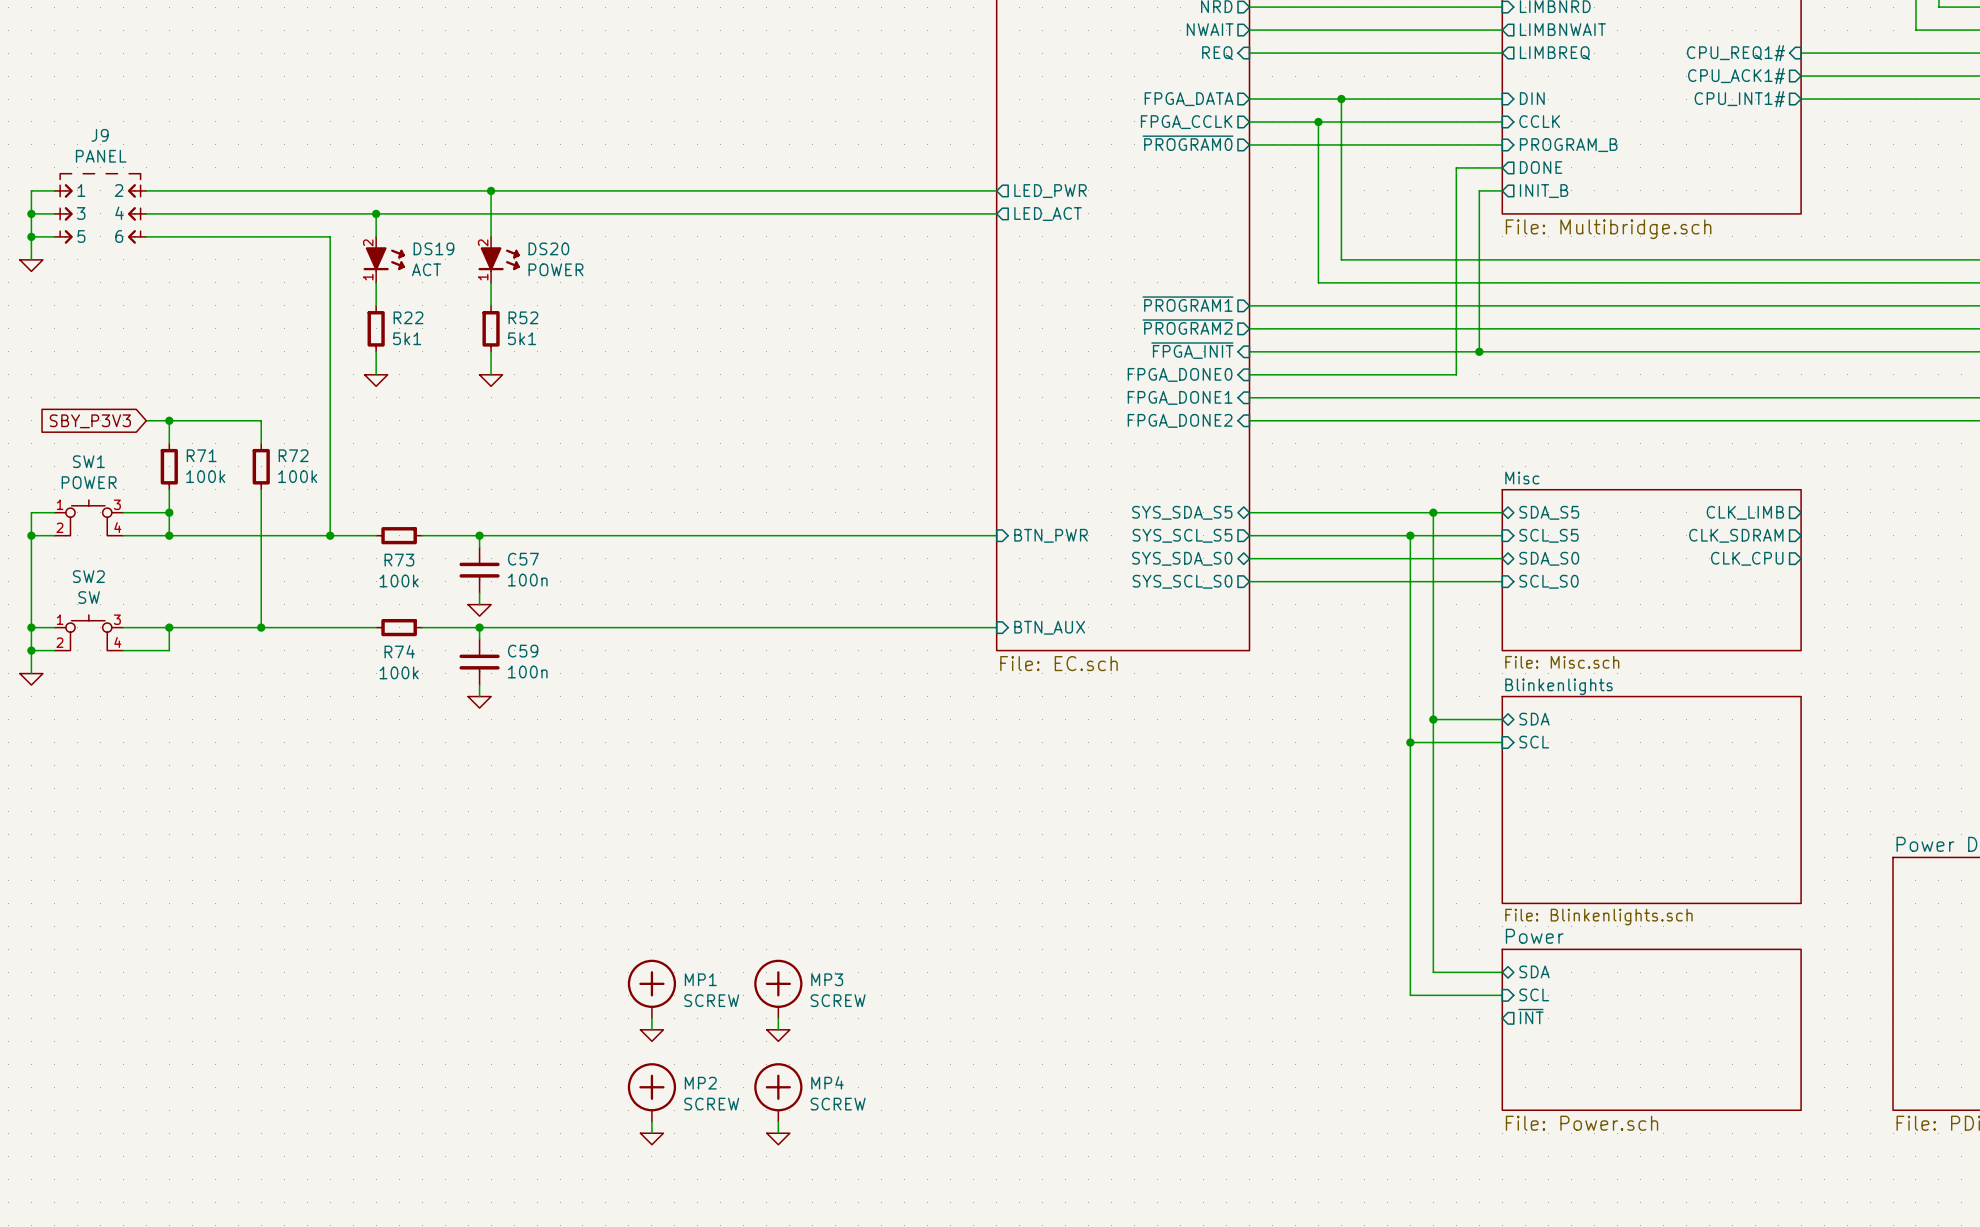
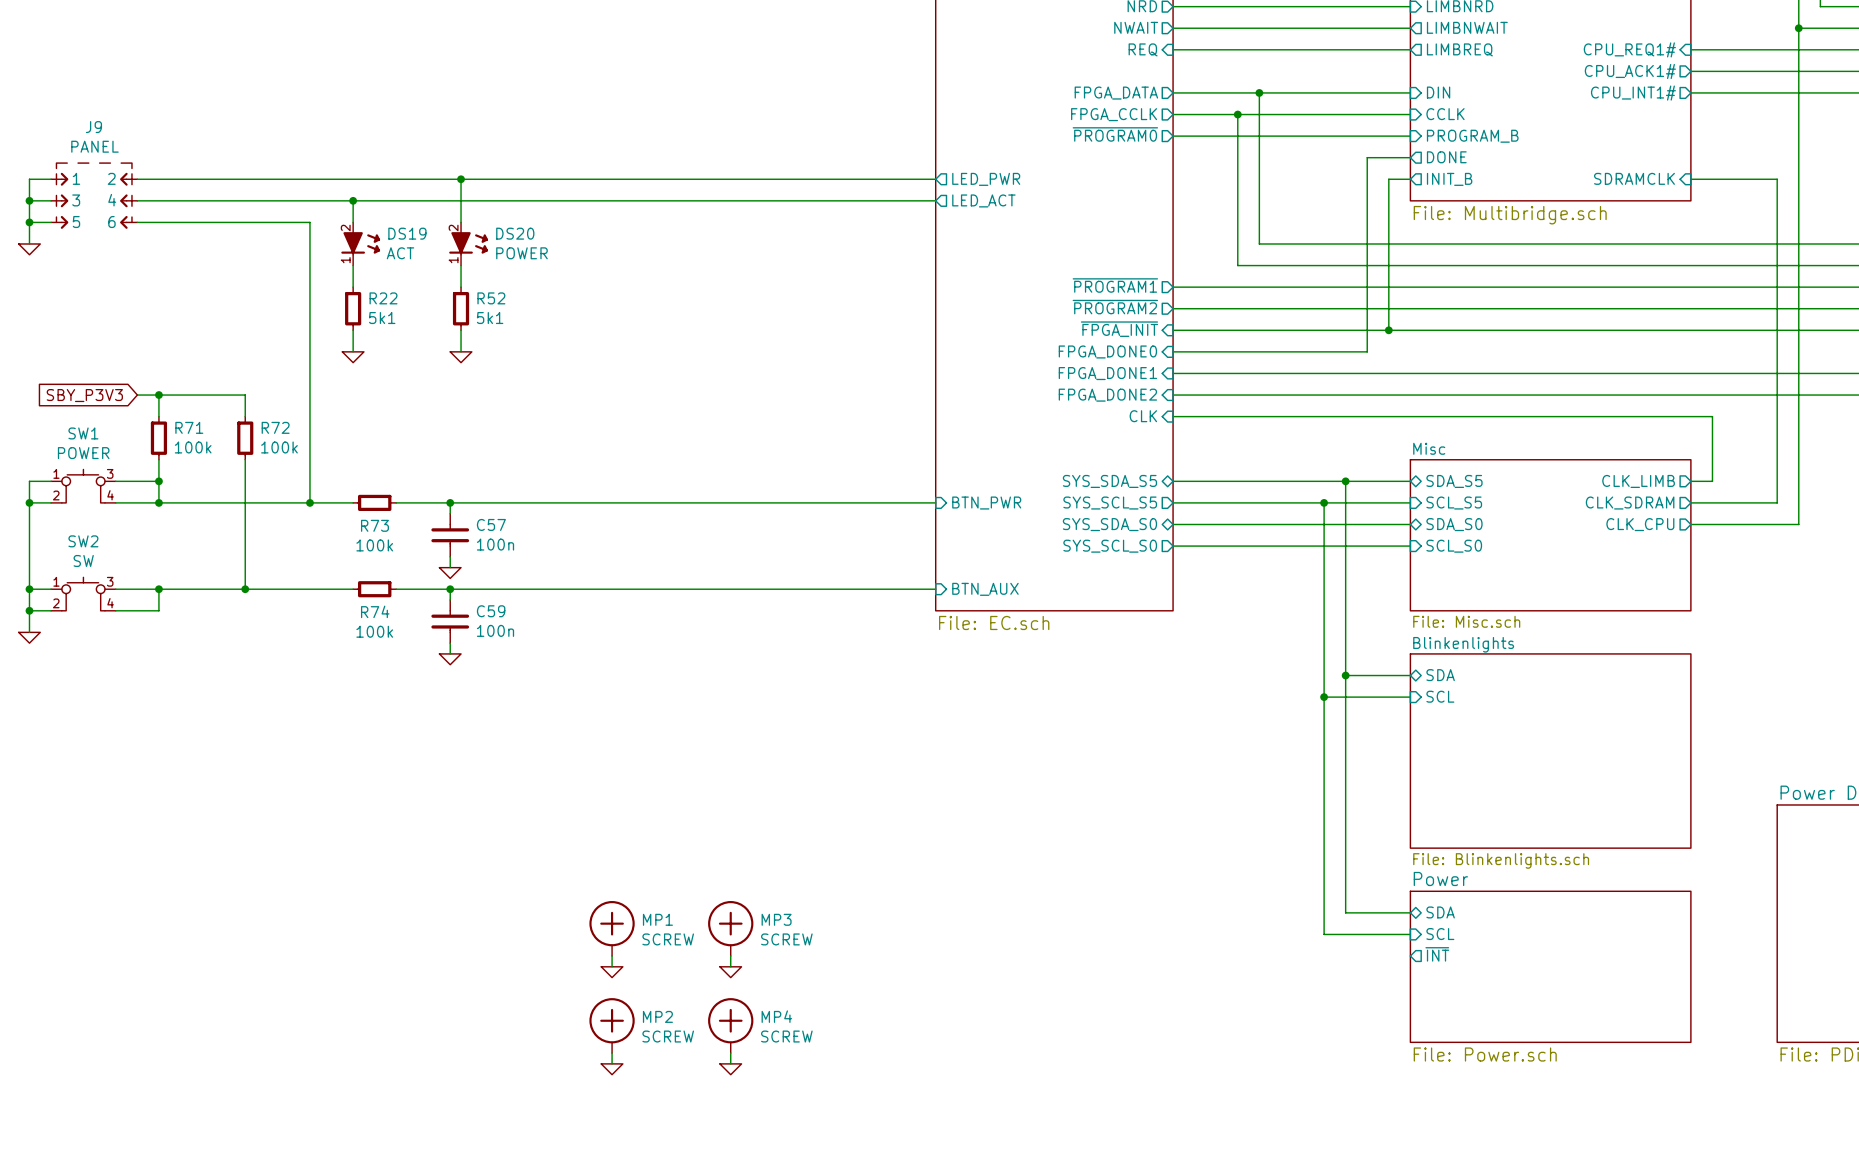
wire: none -> (1798, 28) (1798, 524) (1690, 524)
junction: none -> (1798, 28)
sheet pin: none -> SDRAMCLK (1634, 178)
wire: none -> (1690, 179) (1777, 179) (1777, 502) (1690, 502)
sheet pin: none -> CLK (1143, 416)
wire: none -> (1173, 416) (1712, 416) (1712, 481) (1690, 481)

